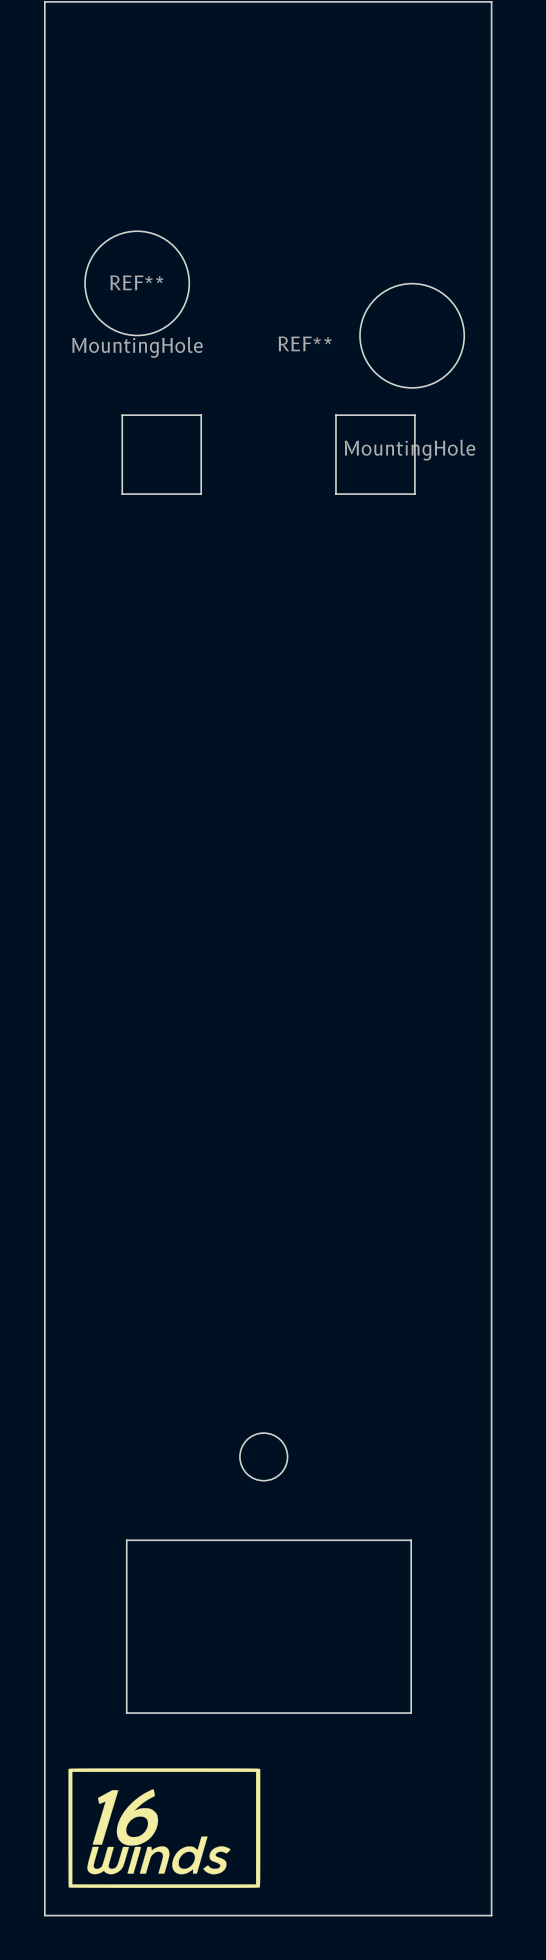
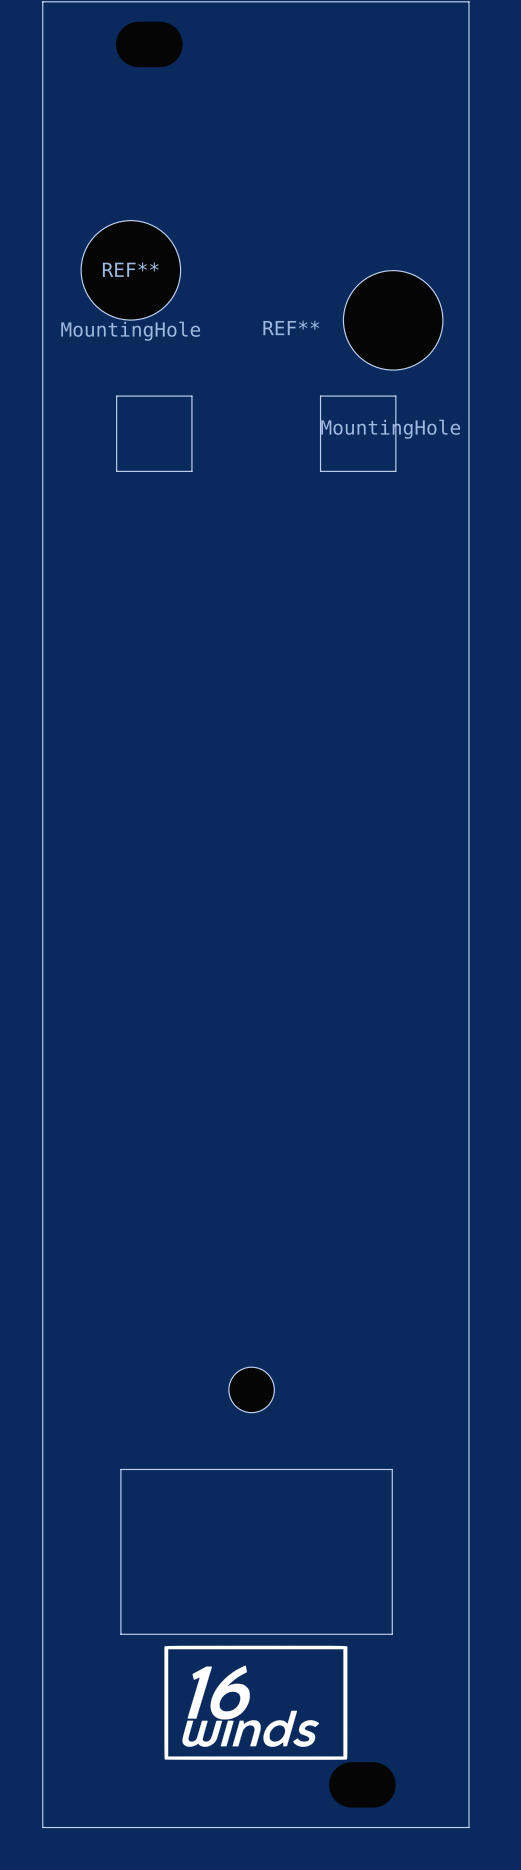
drawing position: (164, 1828) -> (255, 1702)

